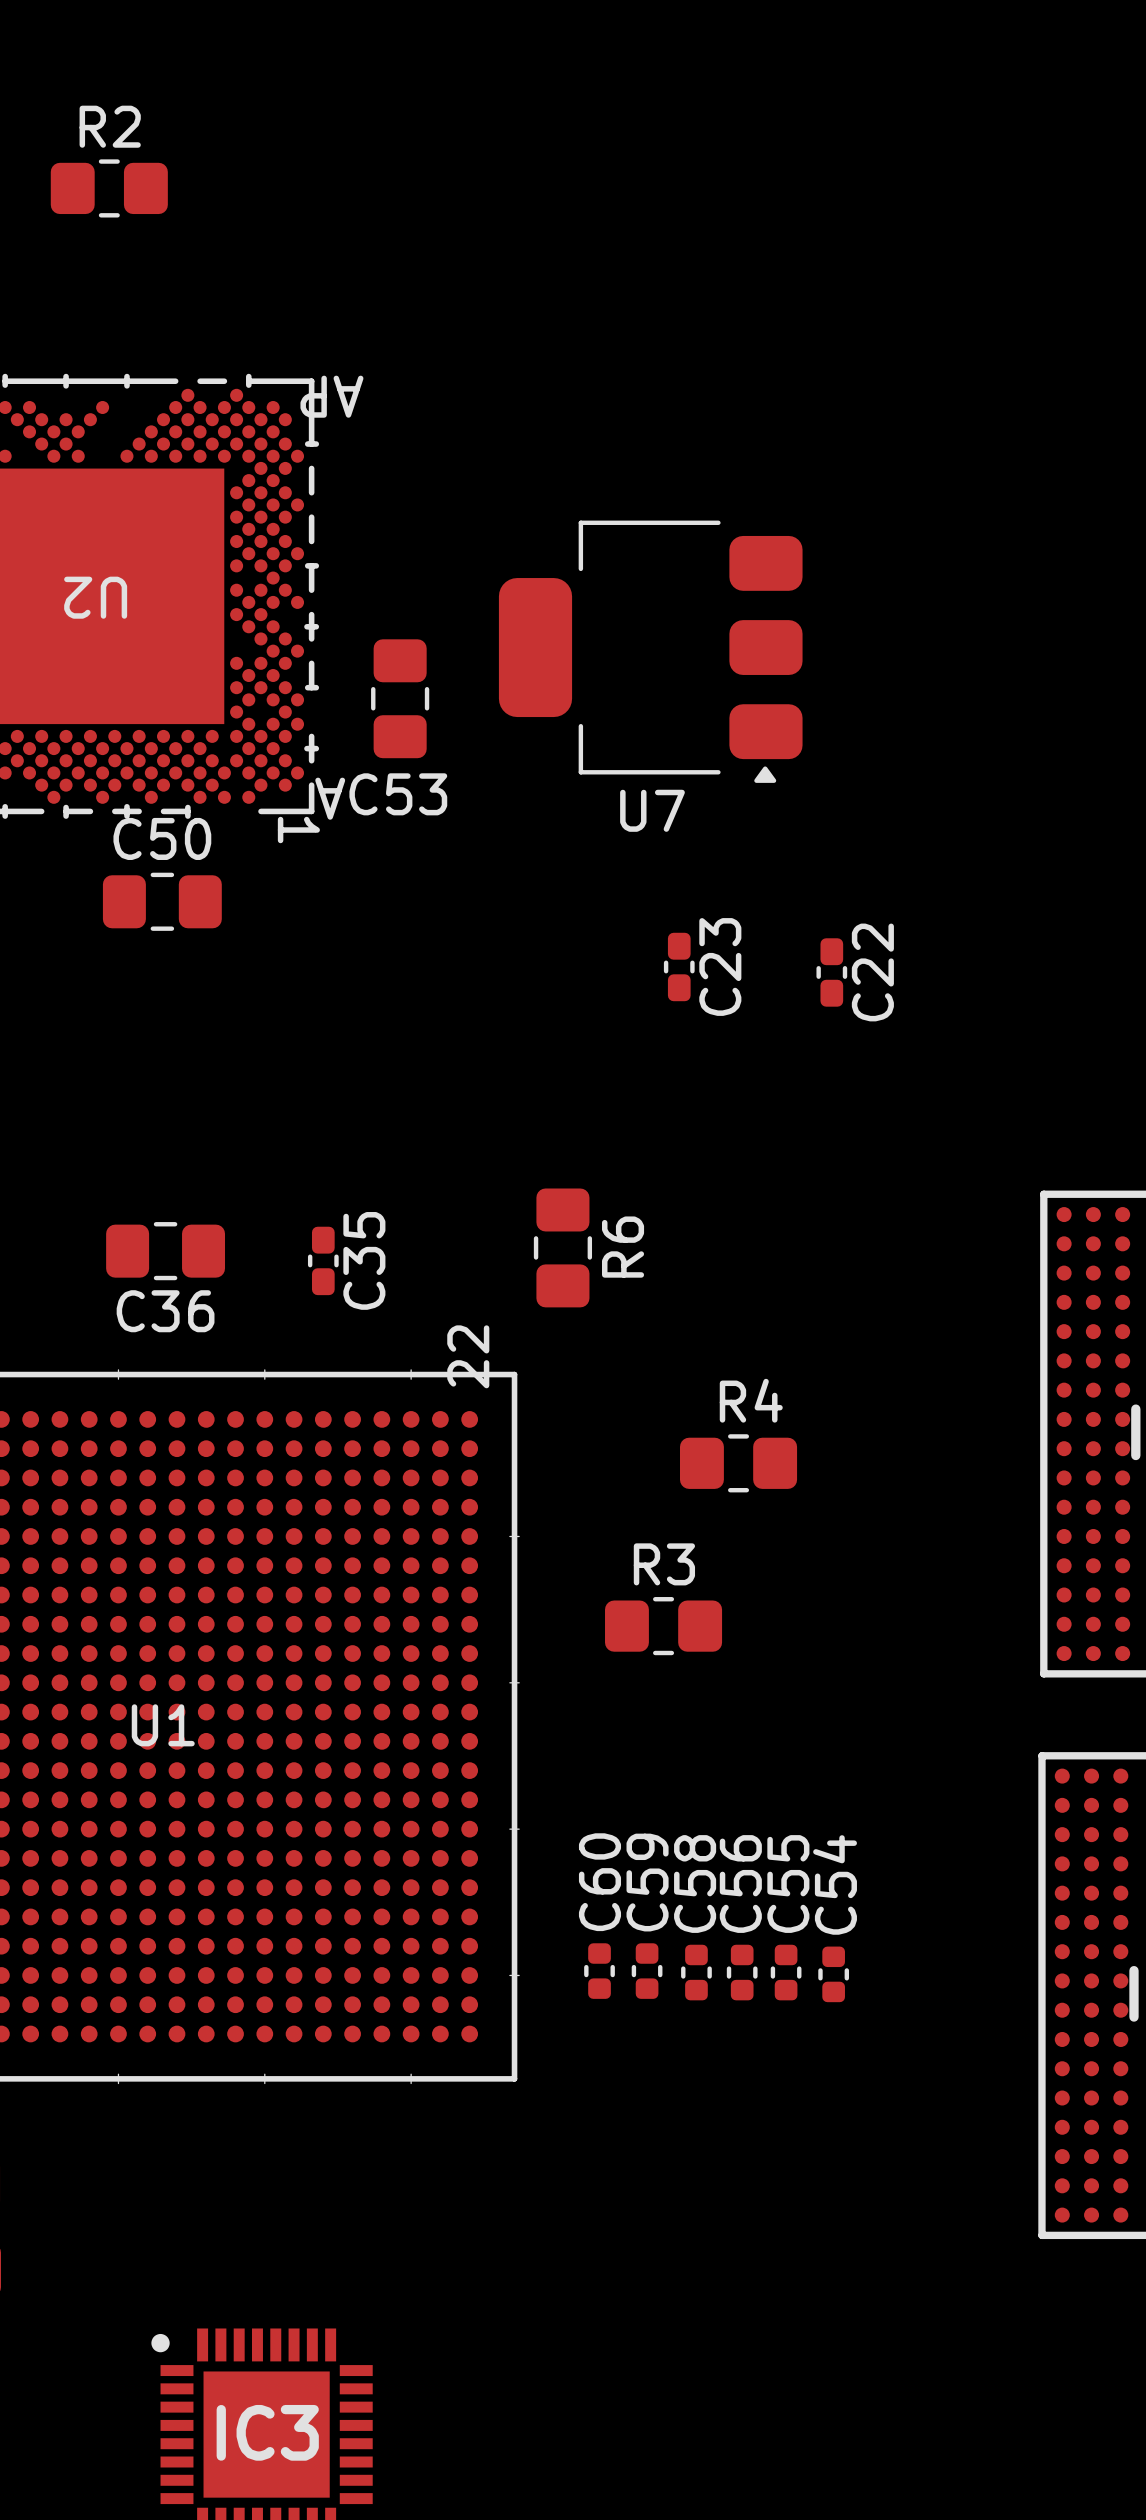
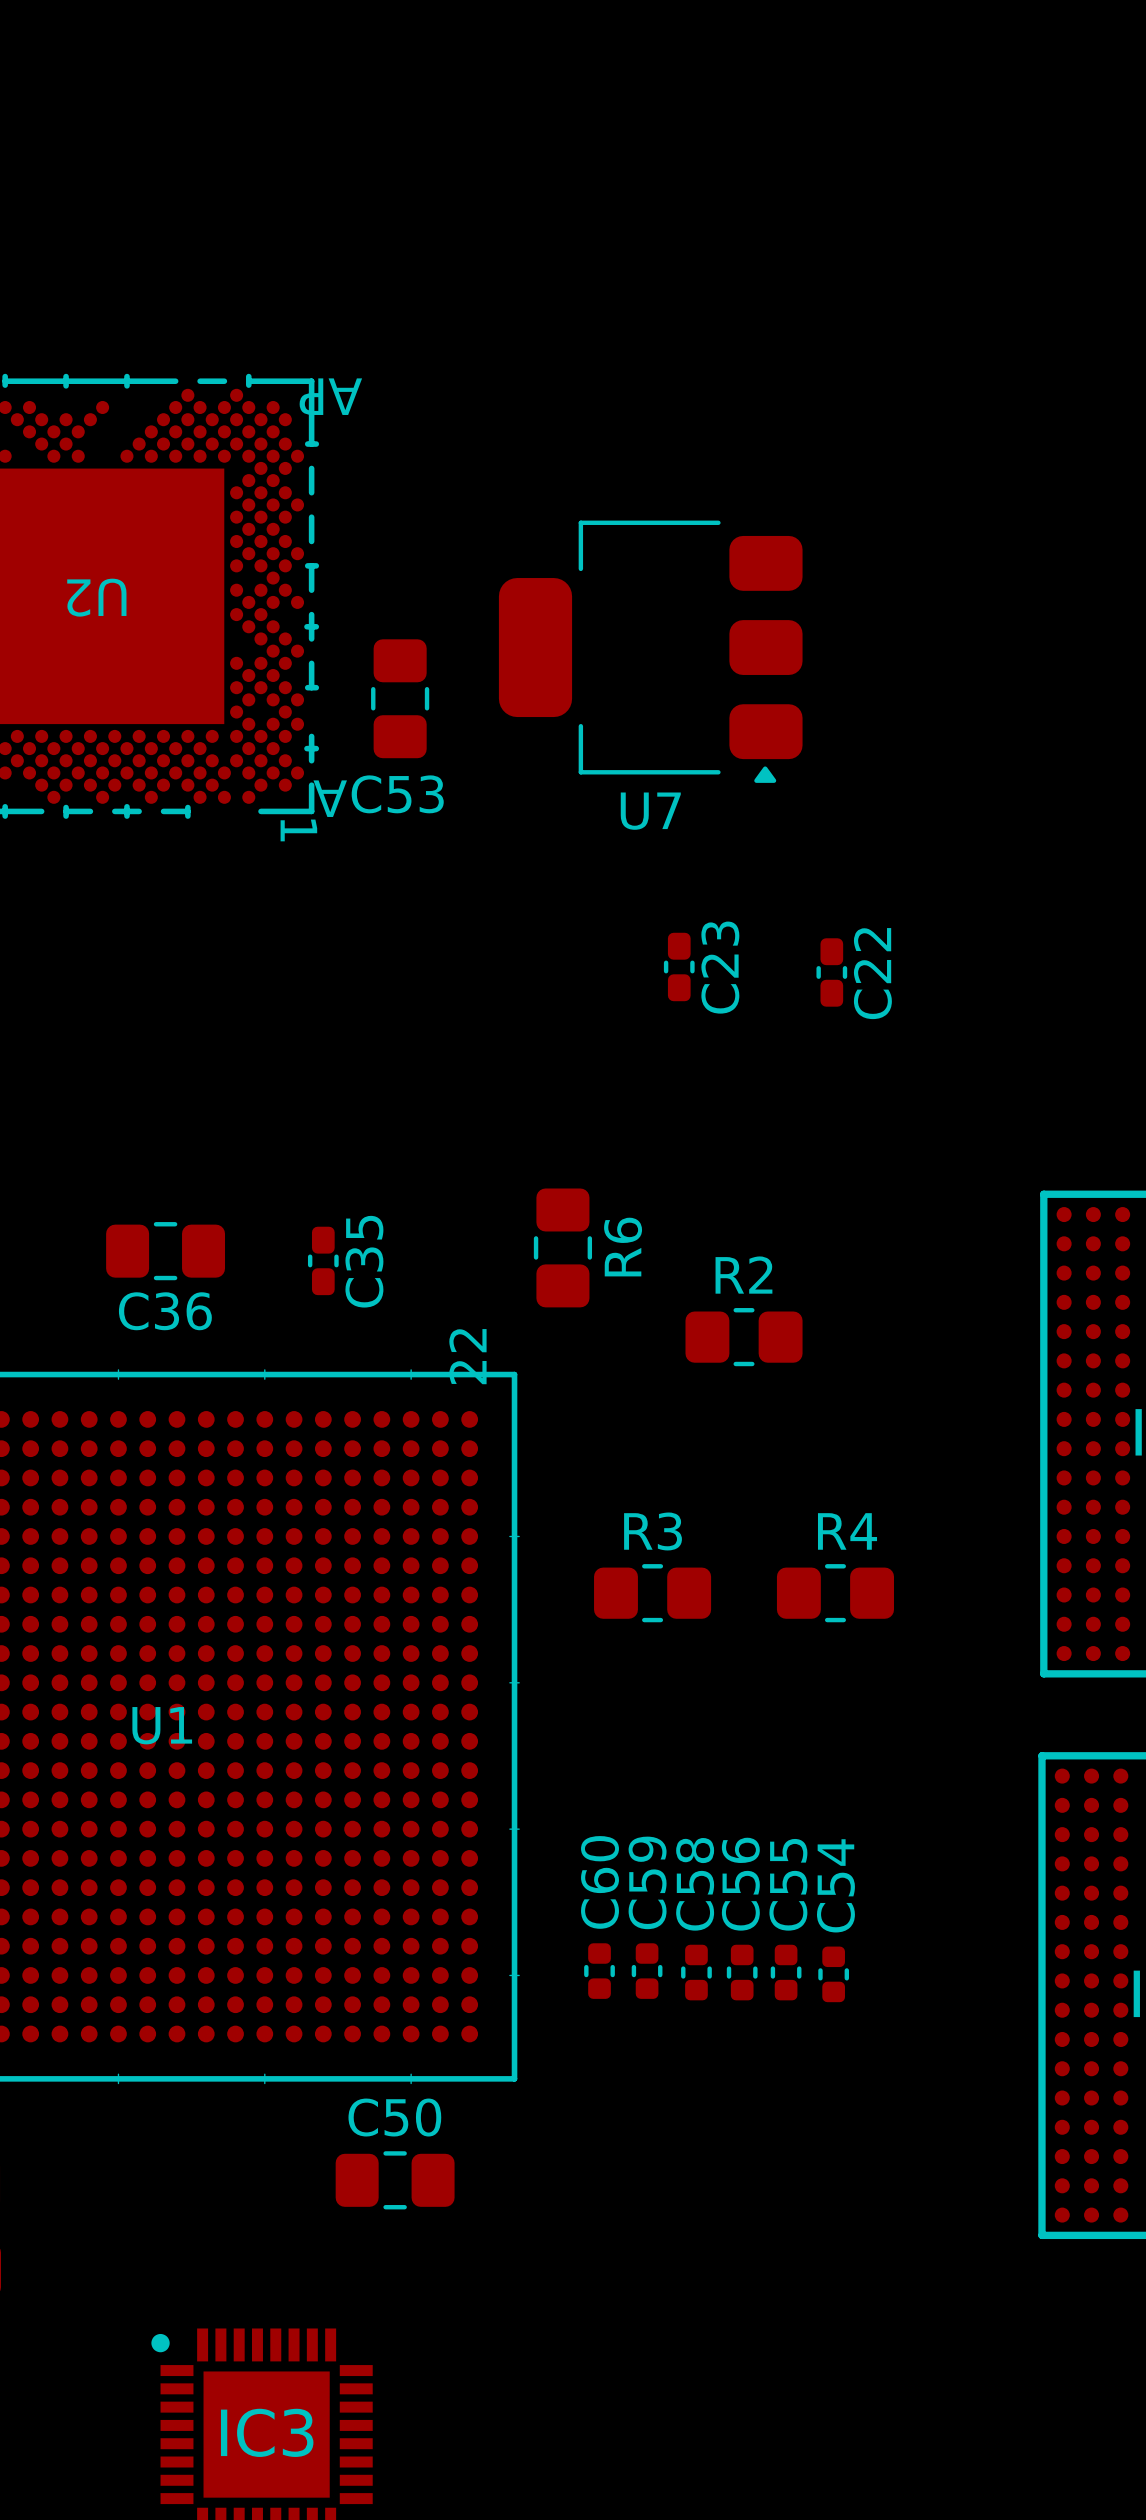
R2 position: (109, 188) -> (744, 1337)
C50 position: (162, 901) -> (395, 2180)
R4 position: (738, 1463) -> (835, 1593)
R3 position: (663, 1626) -> (652, 1593)

